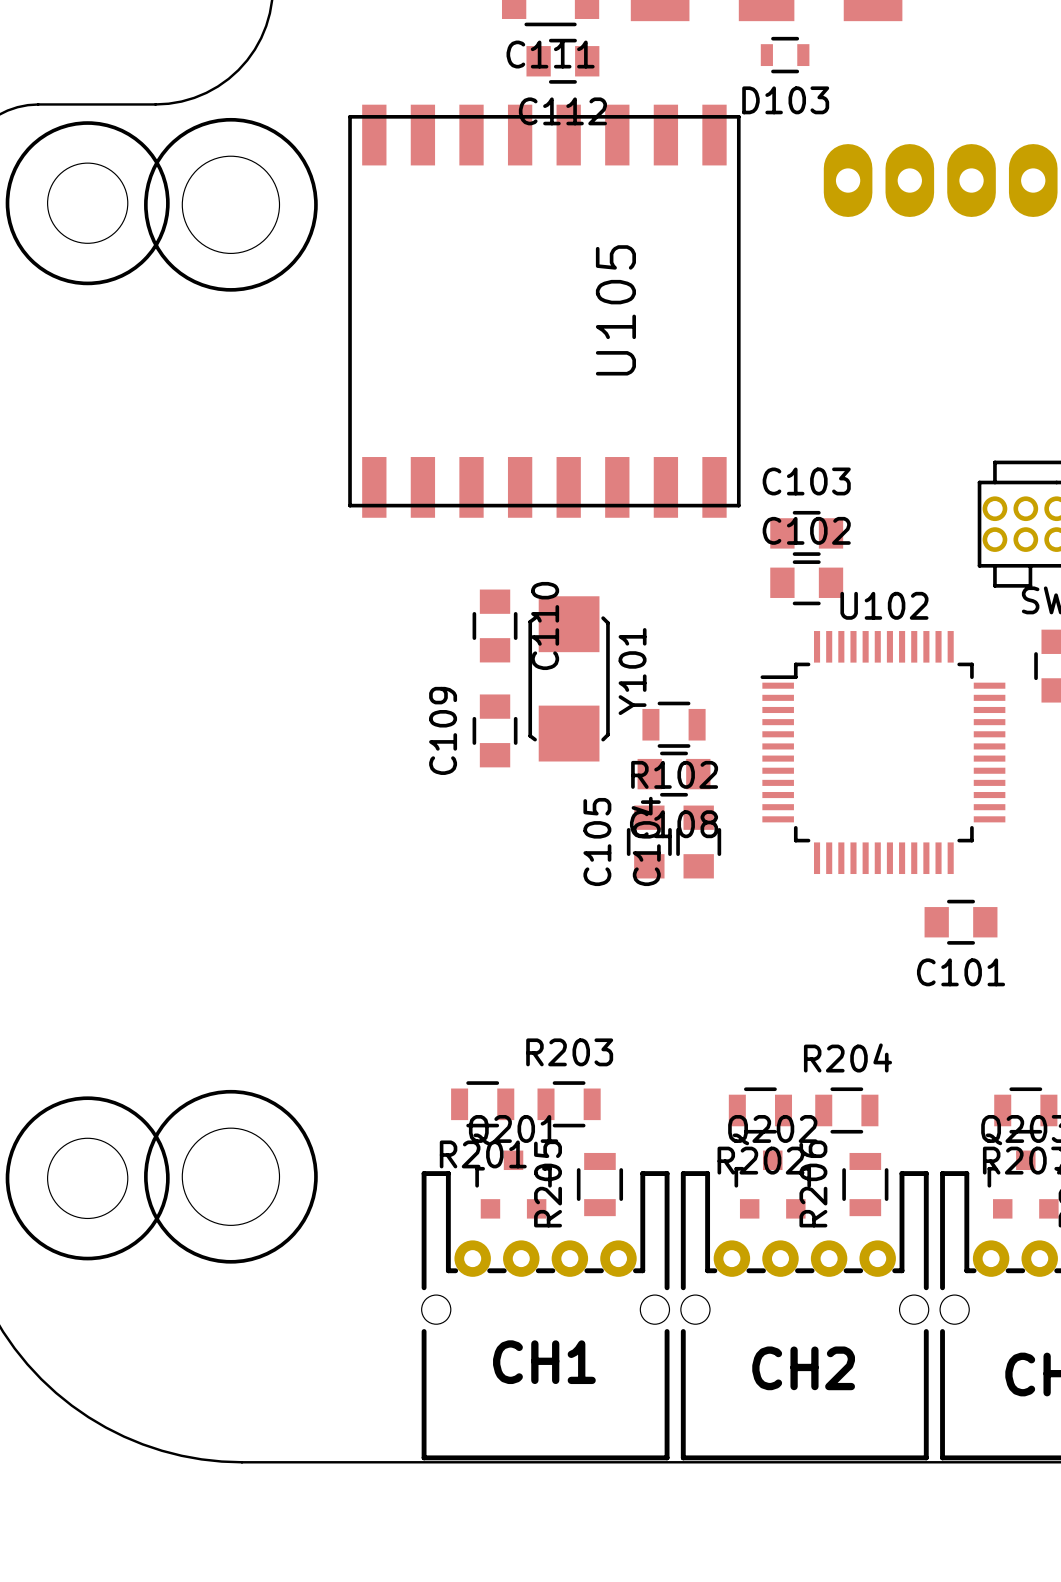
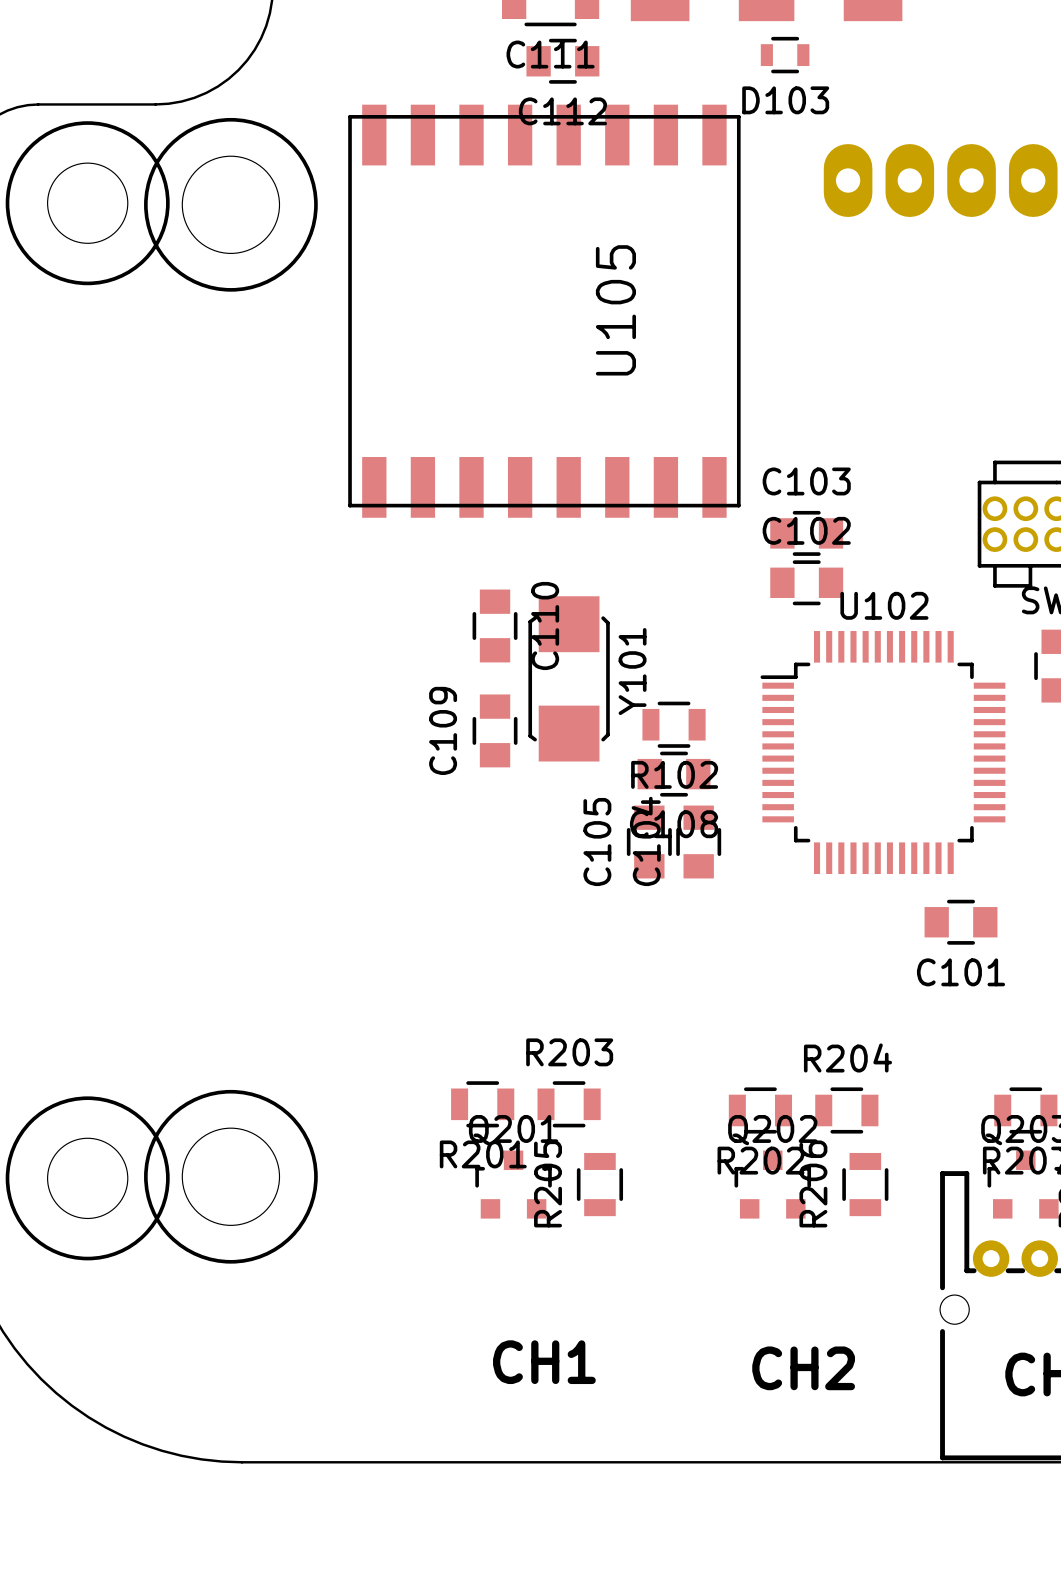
part: (545, 1315) -> none
part: (804, 1315) -> none

